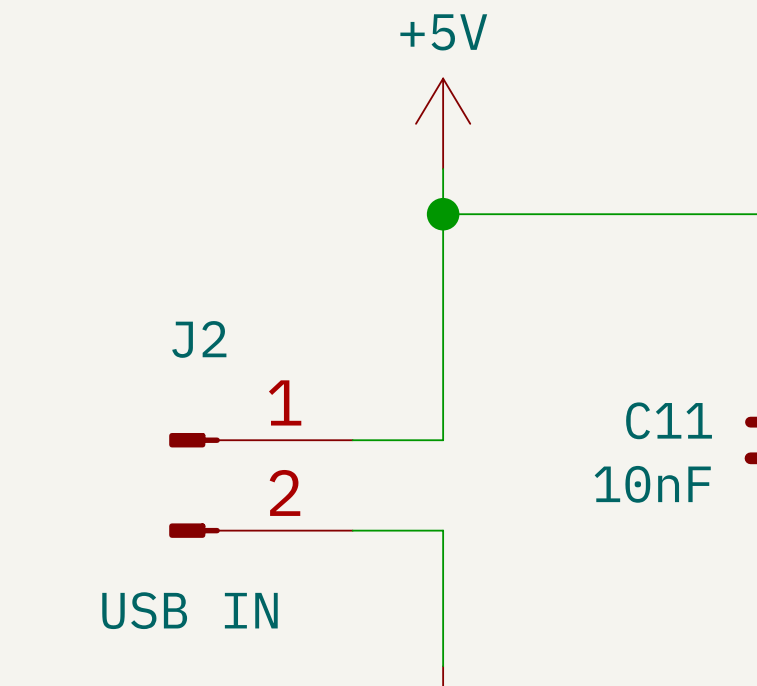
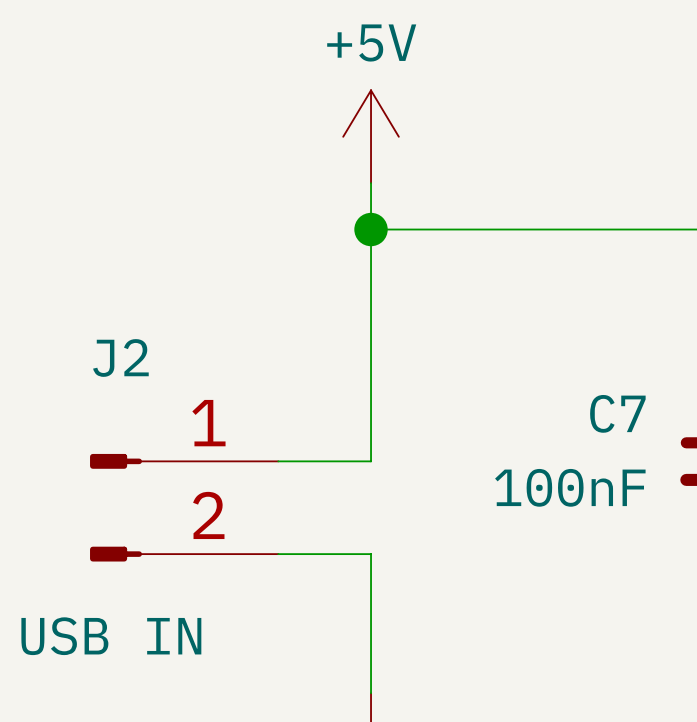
C11 name: C11 (669, 420) -> C7 (617, 413)
C11 value: 10nF (652, 484) -> 100nF (570, 487)

